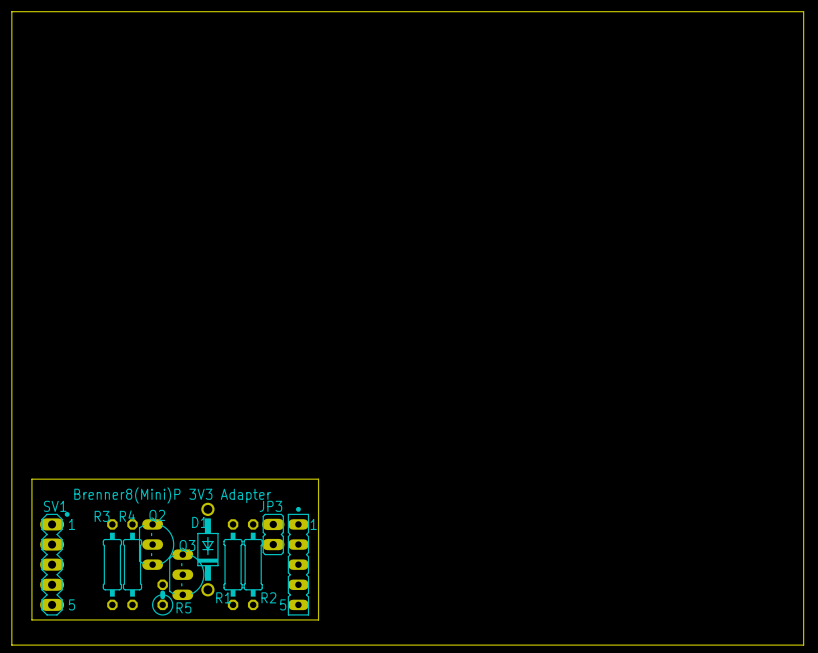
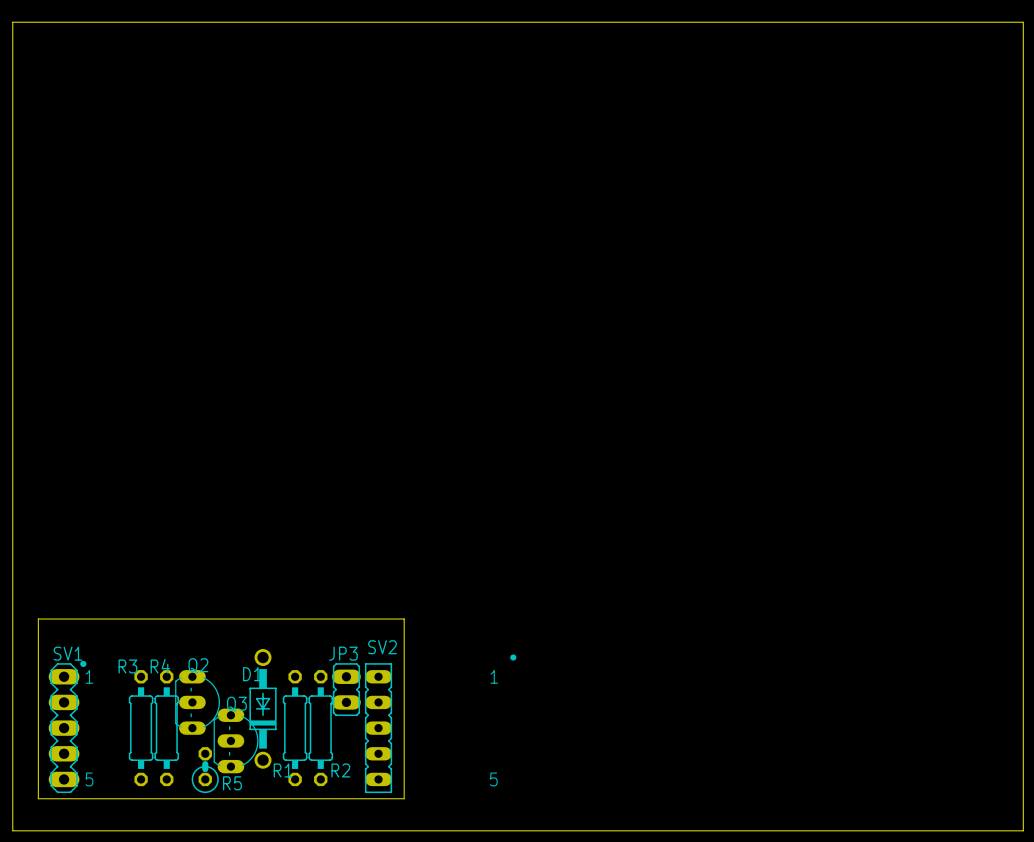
text: Brenner8(Mini)P 3V3 Adapter (172, 495) -> none
SV2 name: none -> SV2 (382, 647)
drawing position: (298, 509) -> (513, 657)
text position: 1 (313, 524) -> 1 (494, 676)
text position: 5 (283, 604) -> 5 (493, 779)

